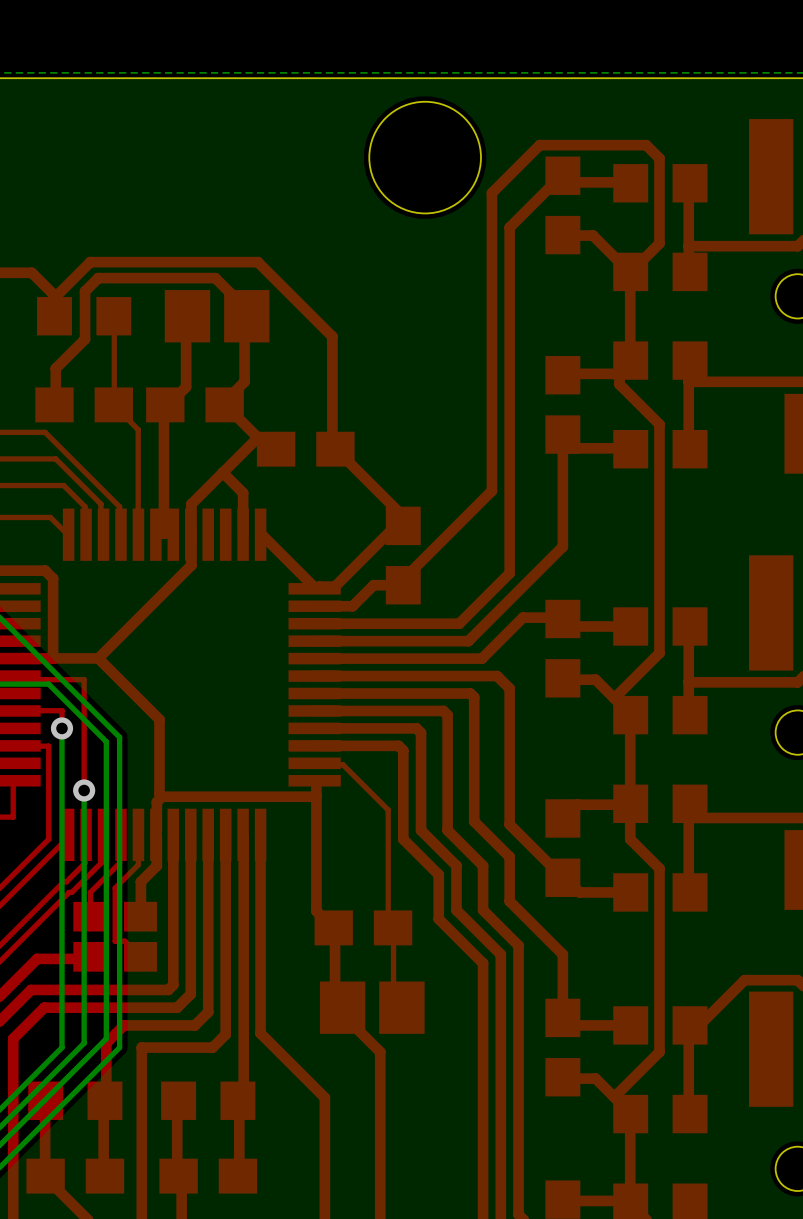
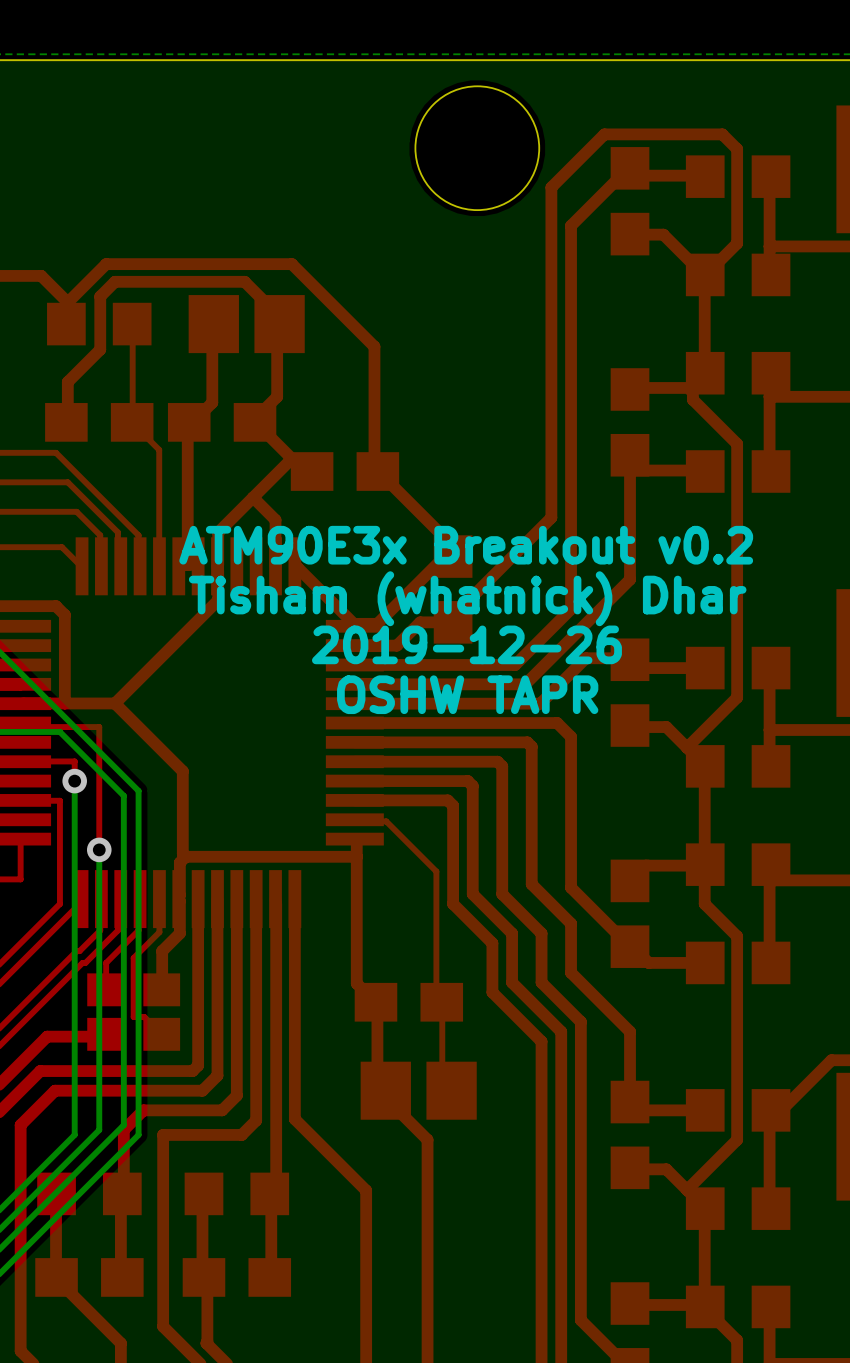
text: none -> ATM90E3x Breakout v0.2 (466, 545)
text: none -> Tisham (whatnick) Dhar (467, 598)
text: none -> 2019-12-26 (466, 644)
text: none -> OSHW TAPR (467, 694)

